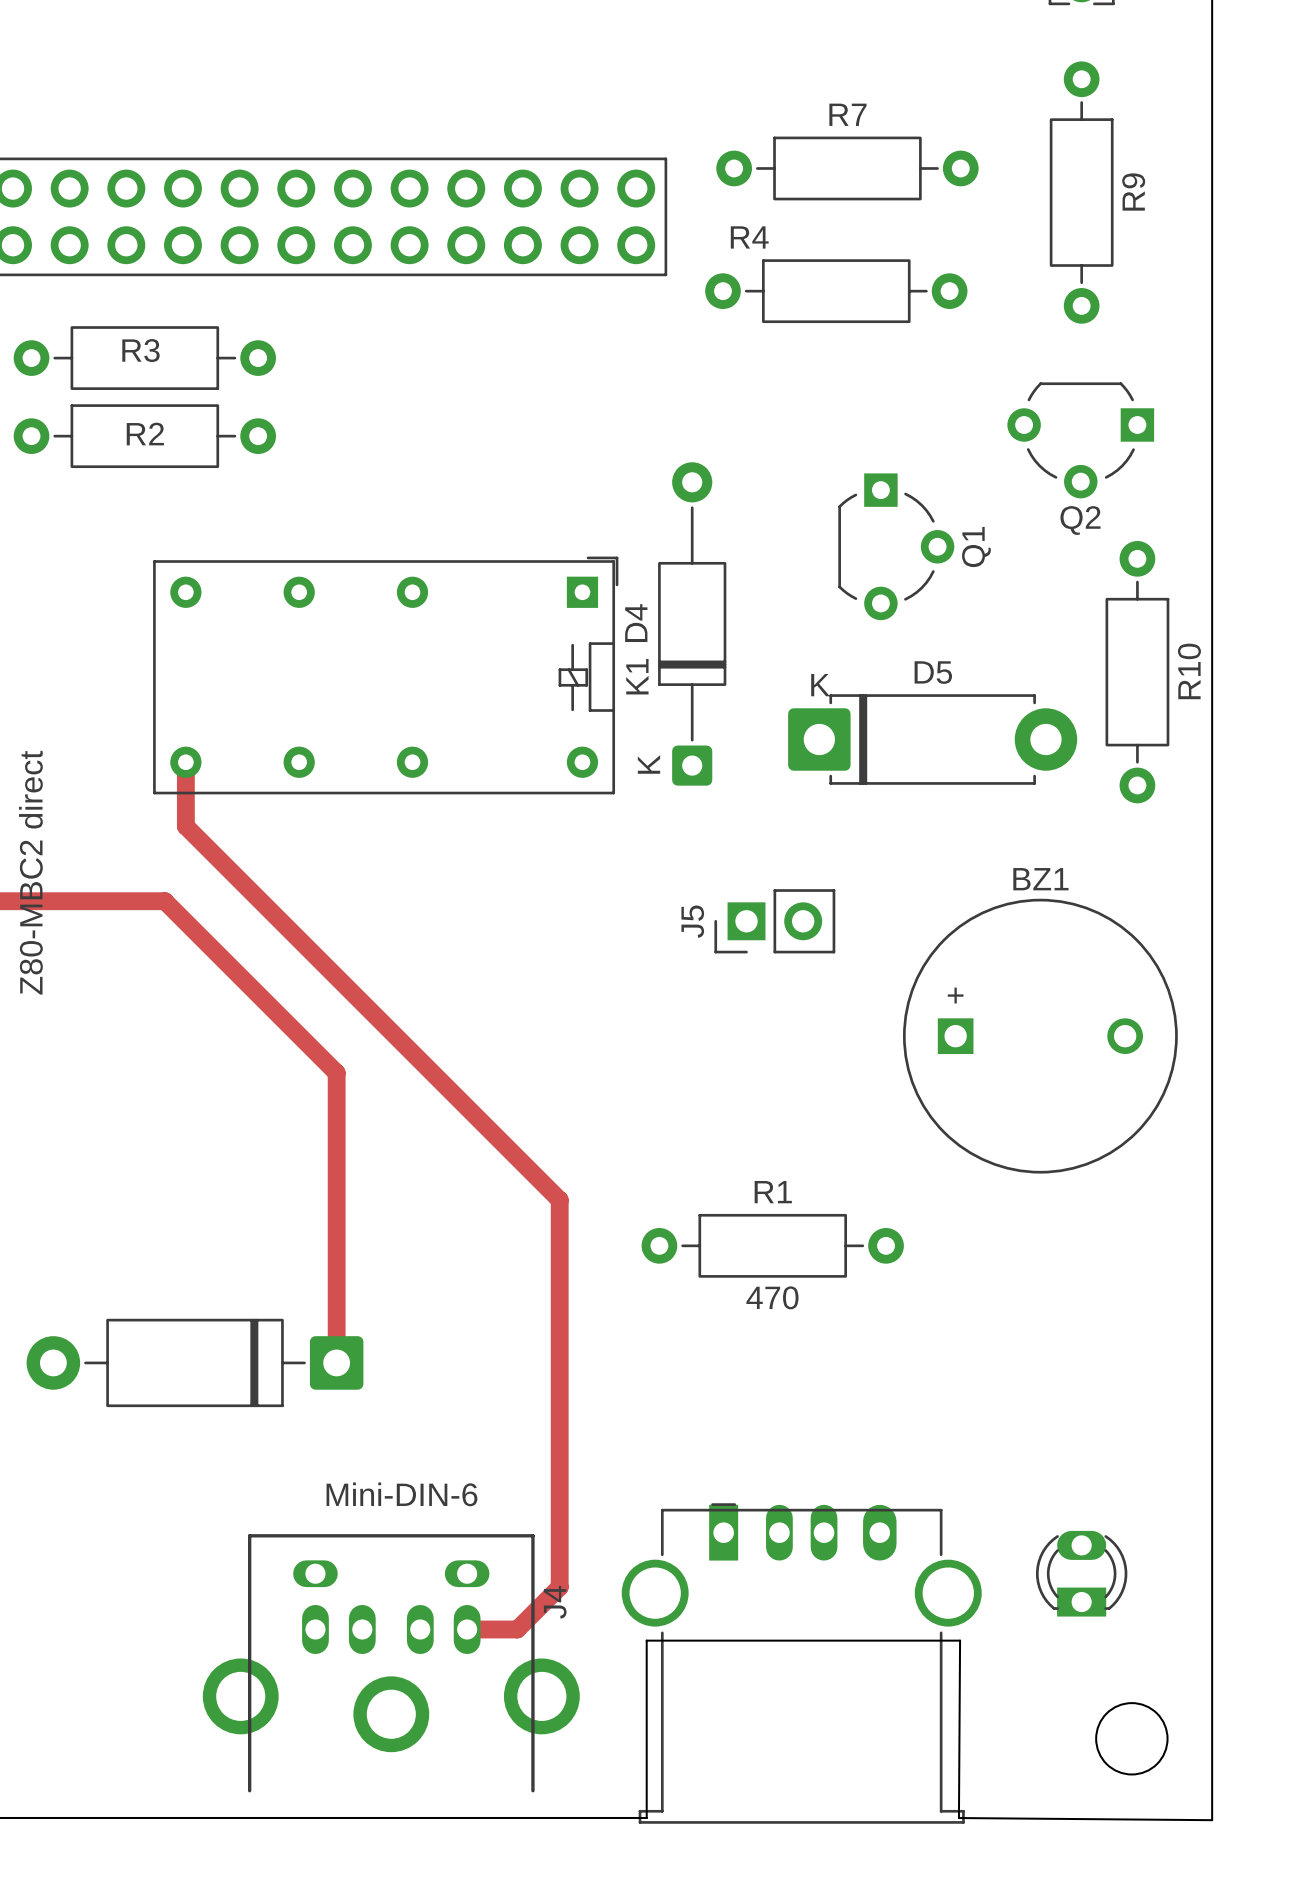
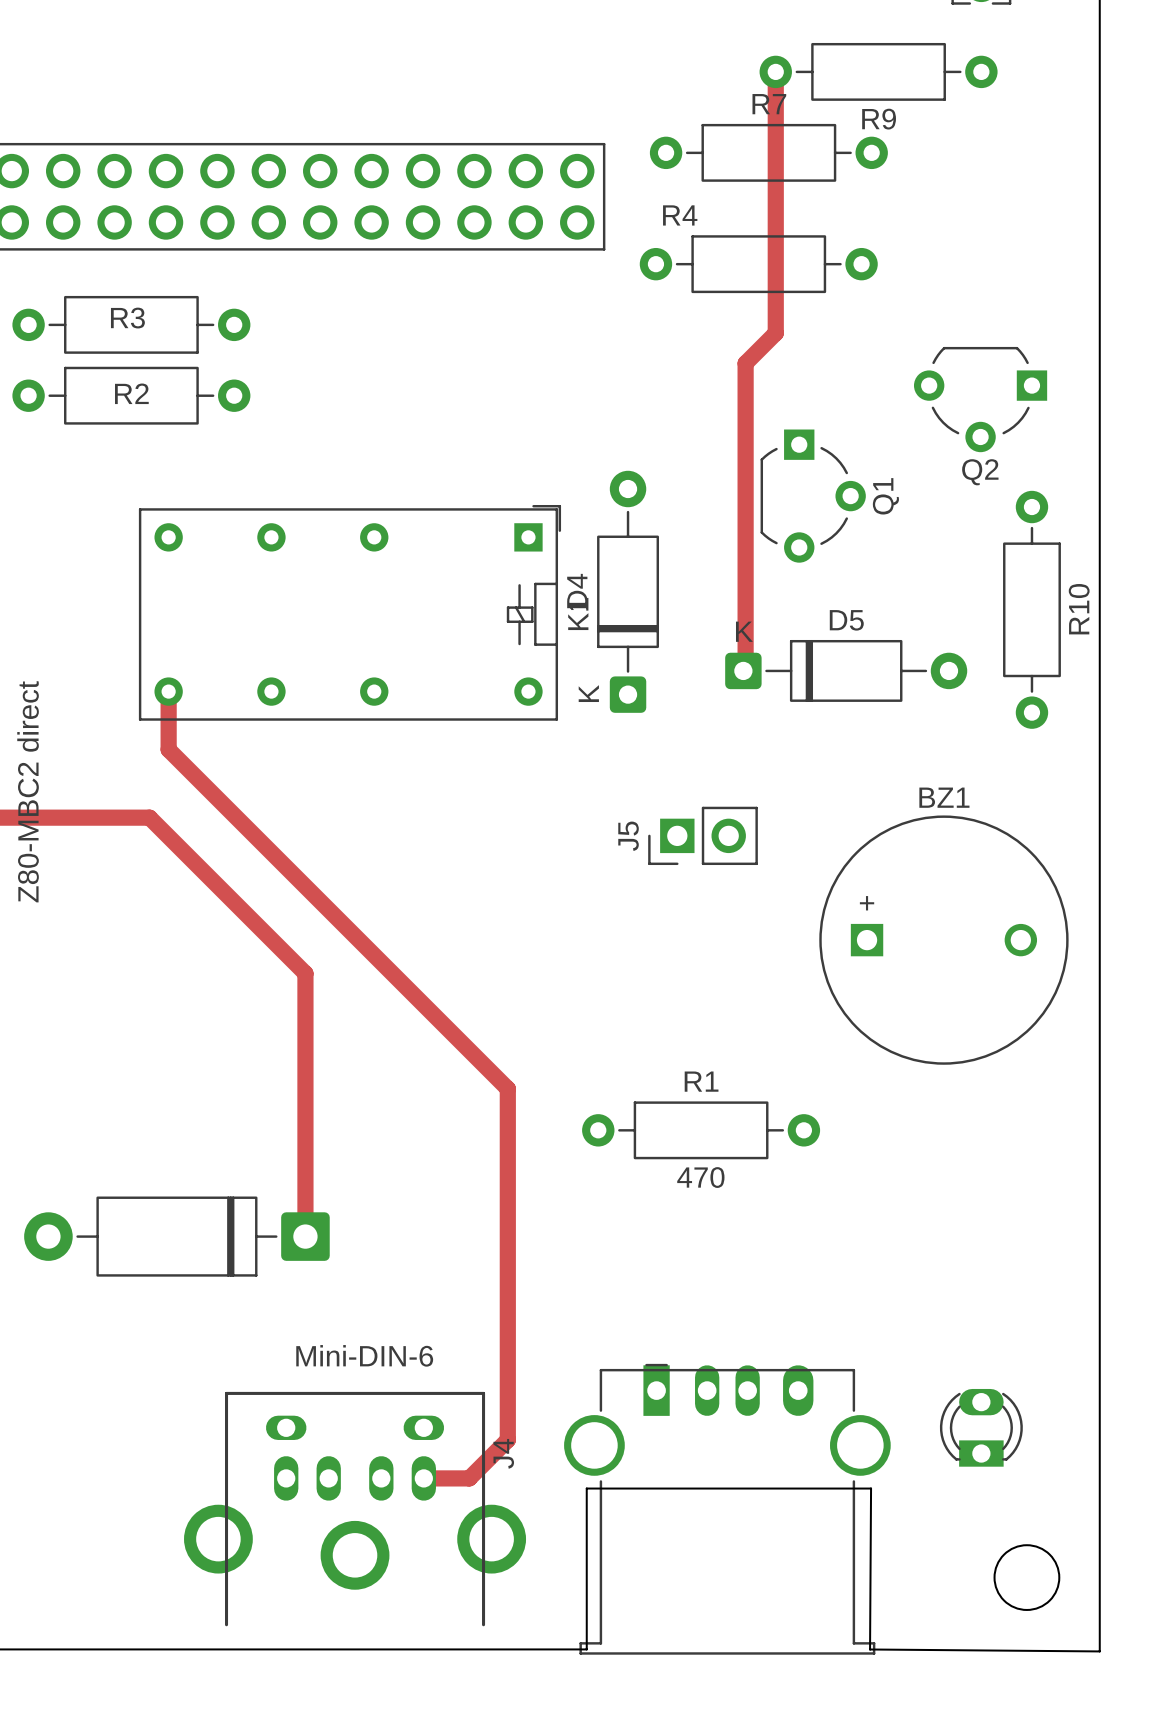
track: none -> (775, 71) (775, 333) (745, 363) (745, 668) (743, 670)
R9 rotation: 0° (1081, 192) -> 90° clockwise (878, 71)
R9 position: (1081, 192) -> (878, 71)
D4 footprint: [658, 462, 727, 786] -> [597, 470, 659, 713]
D5 footprint: [788, 694, 1078, 785] -> [725, 639, 968, 702]

